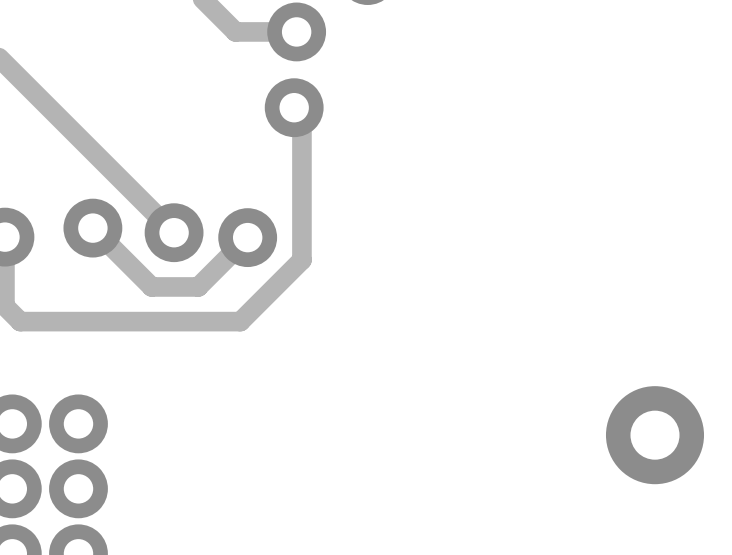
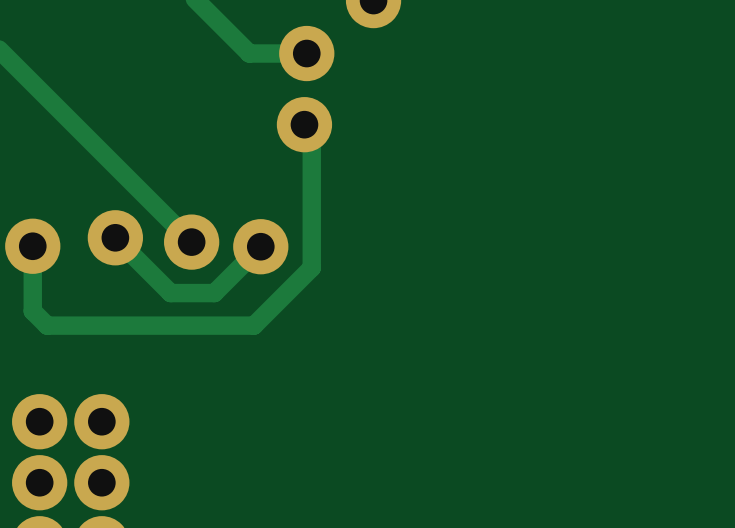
part: (654, 435) -> none

